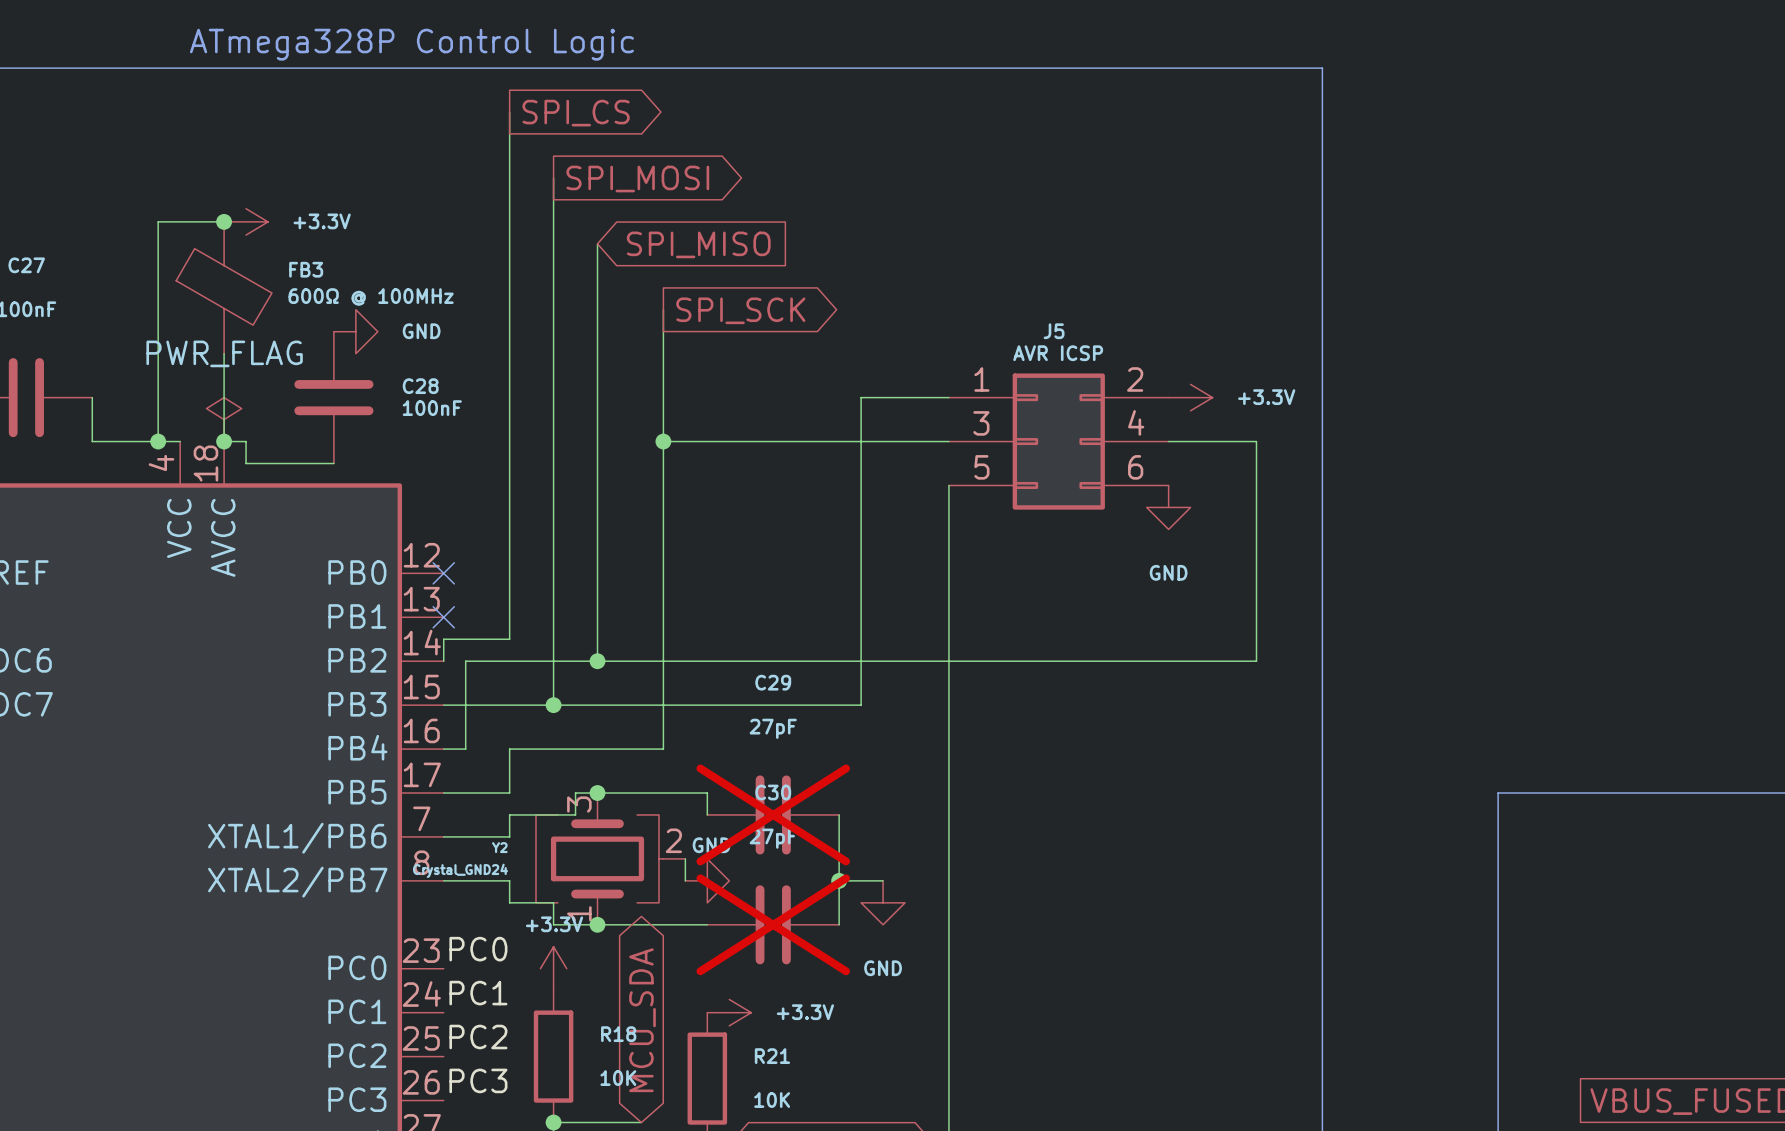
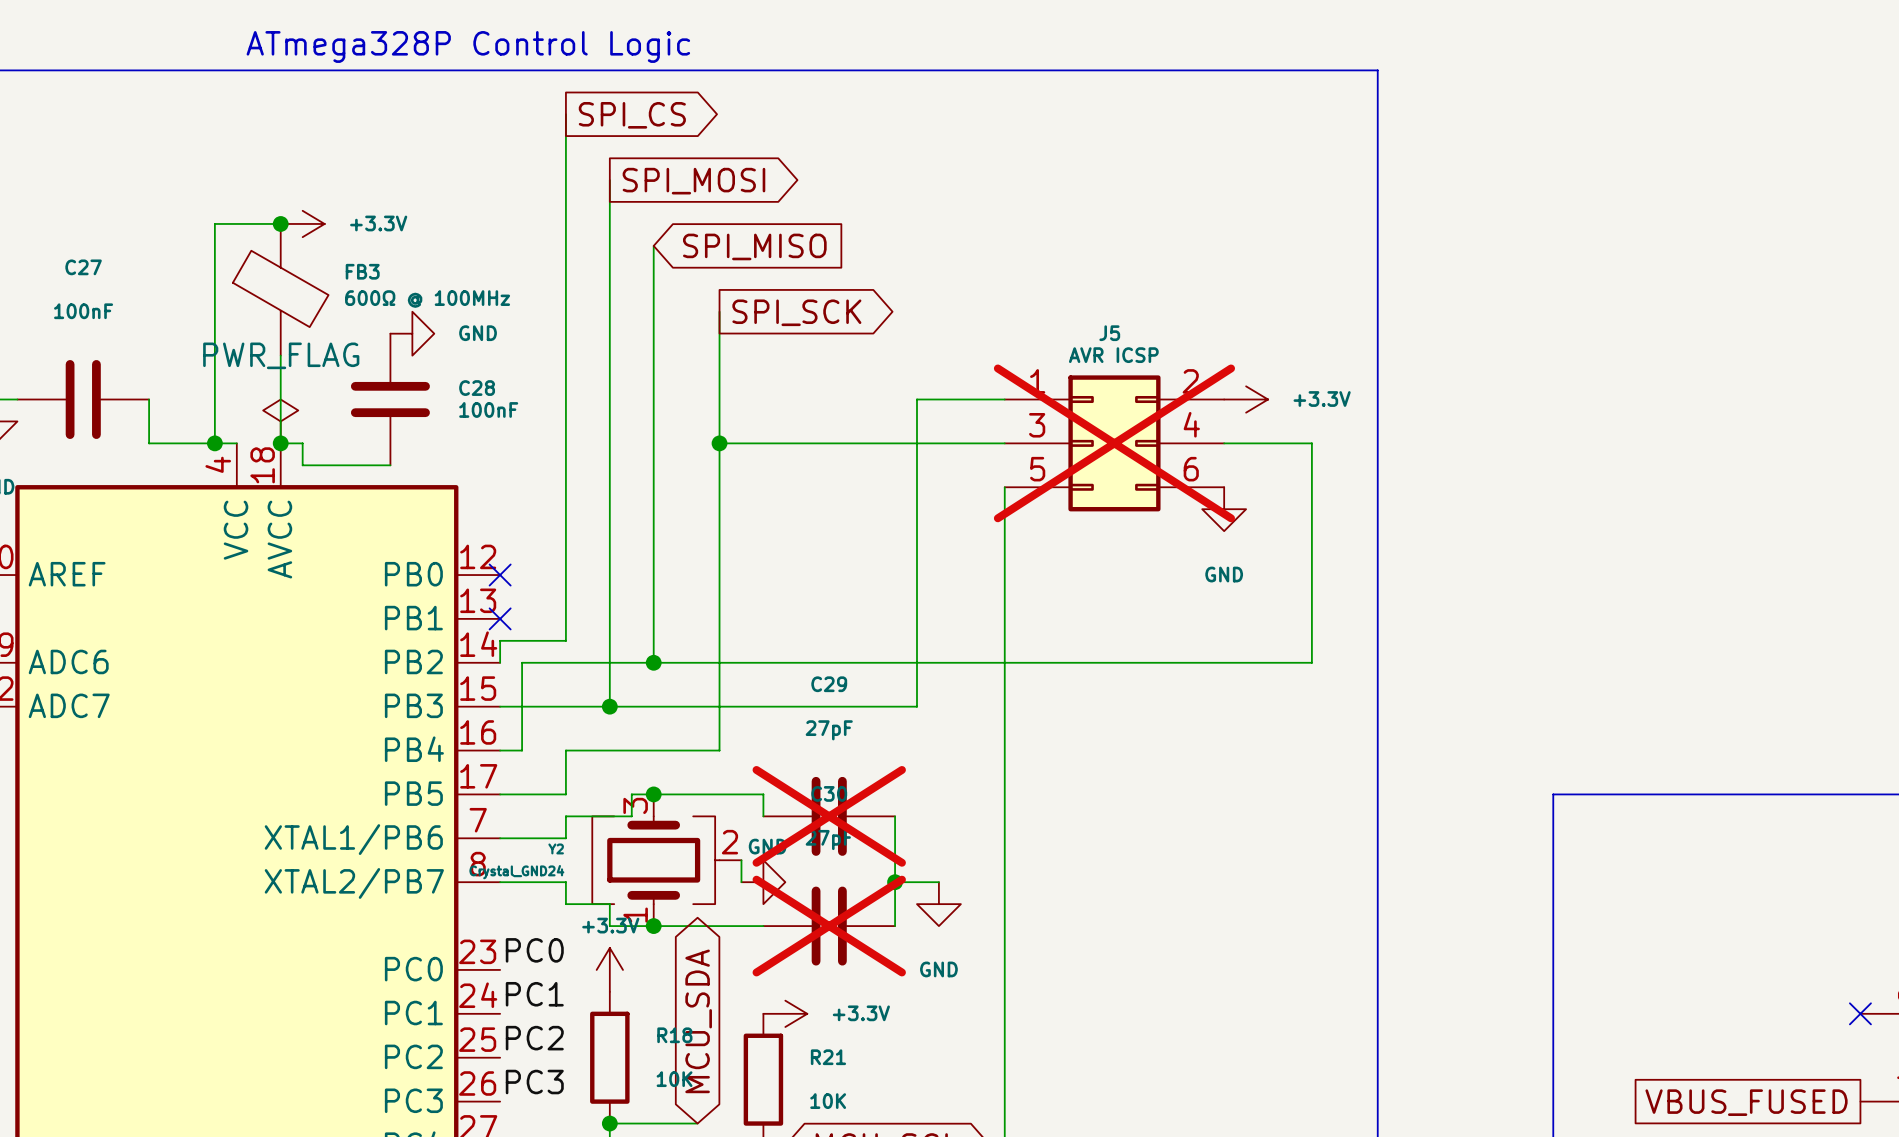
J5 do-not-place cross: none -> (1114, 443)

